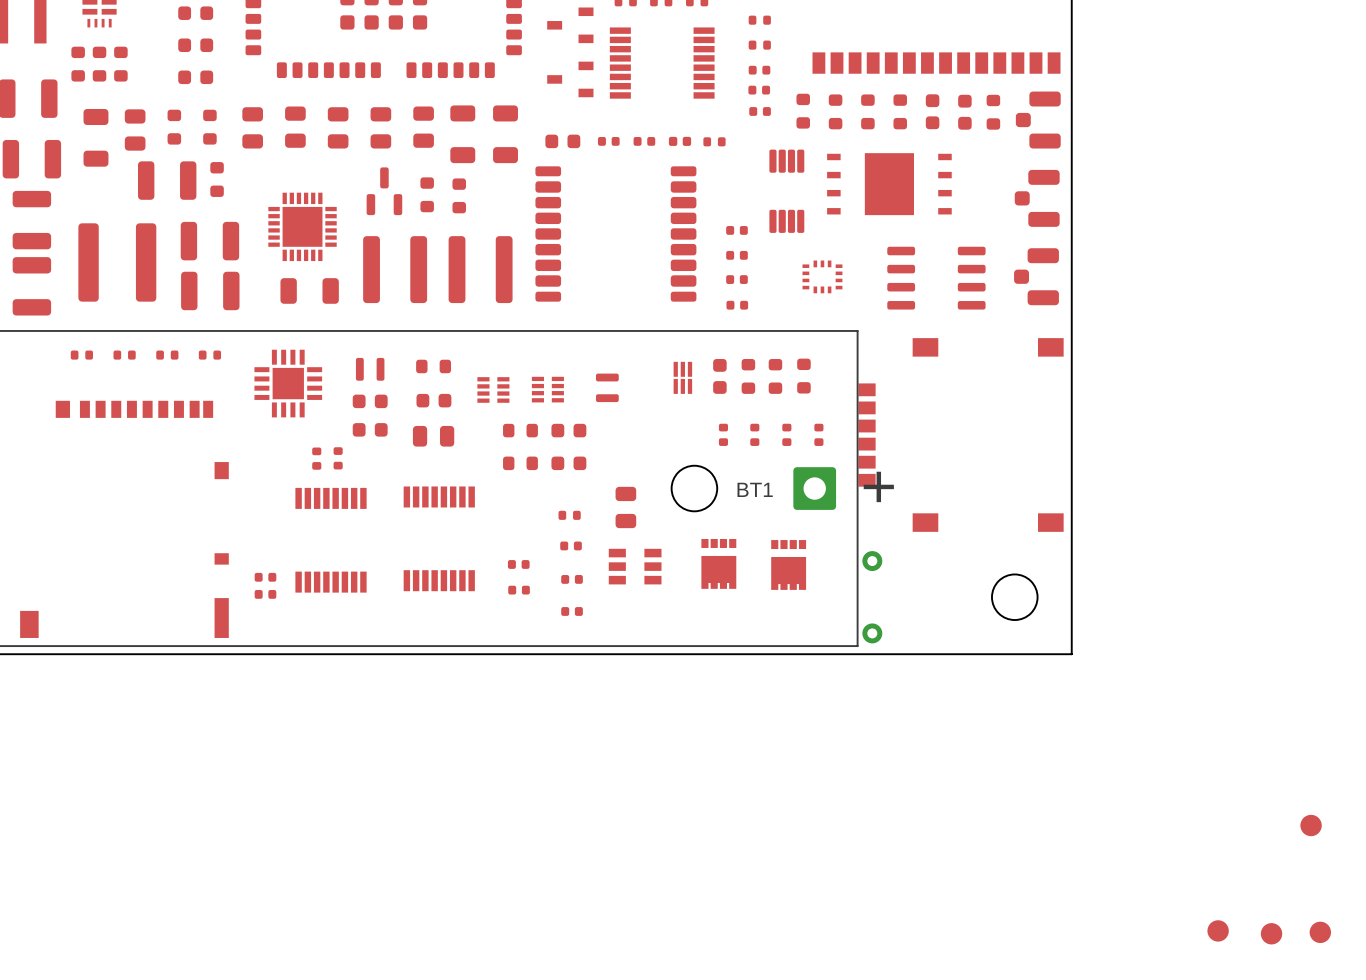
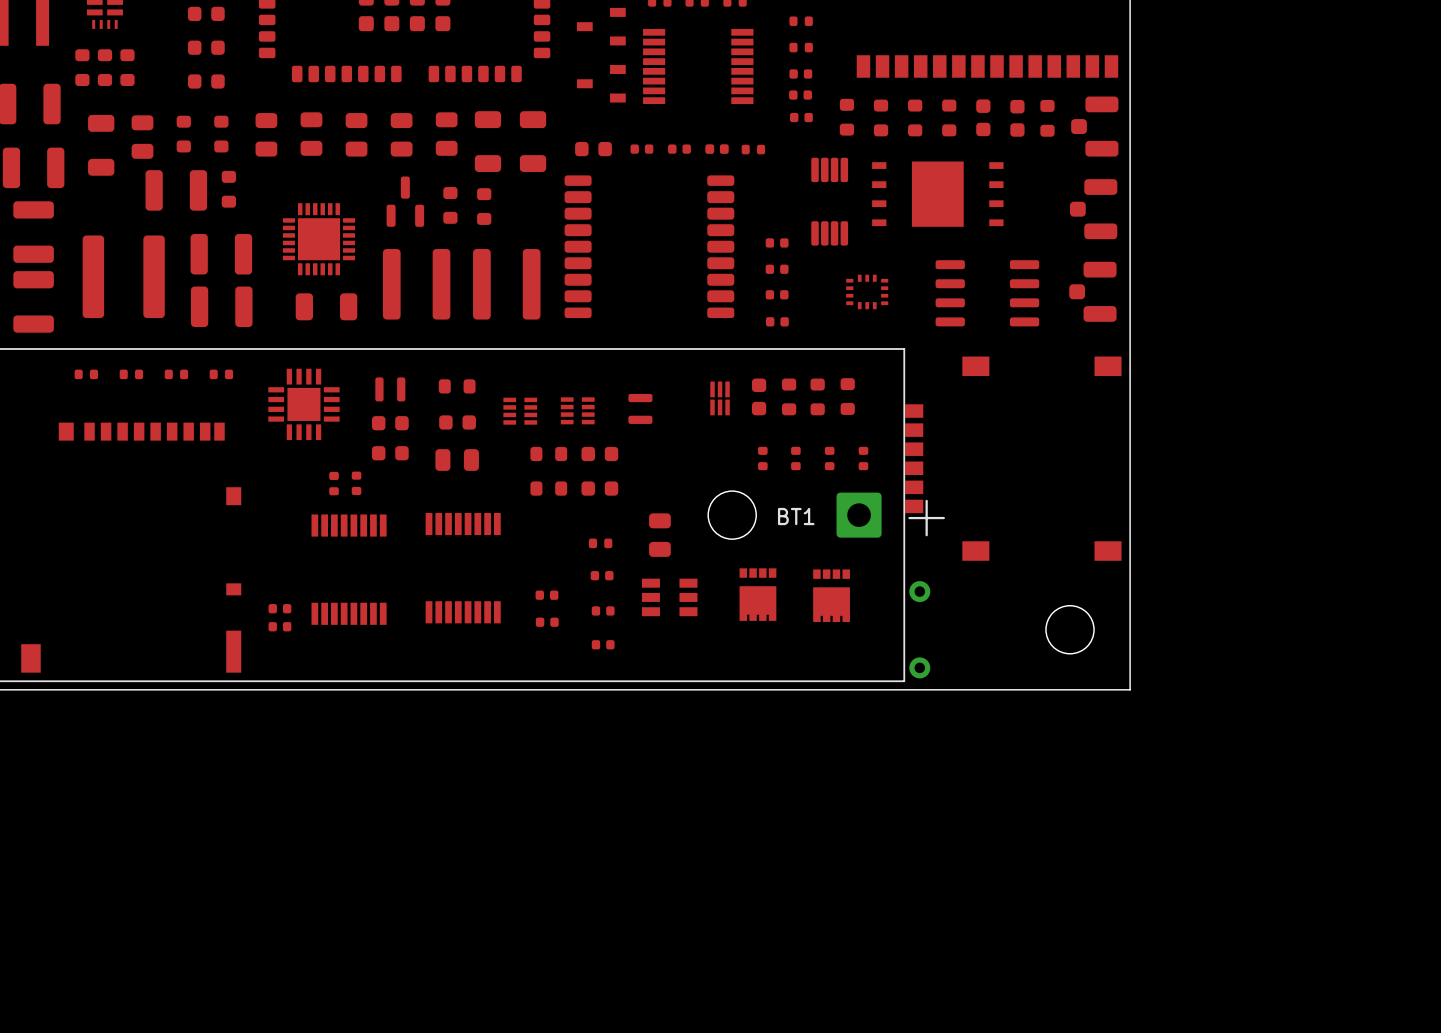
part: (1311, 825) -> none
part: (1218, 930) -> none
part: (1320, 932) -> none
part: (1271, 933) -> none

